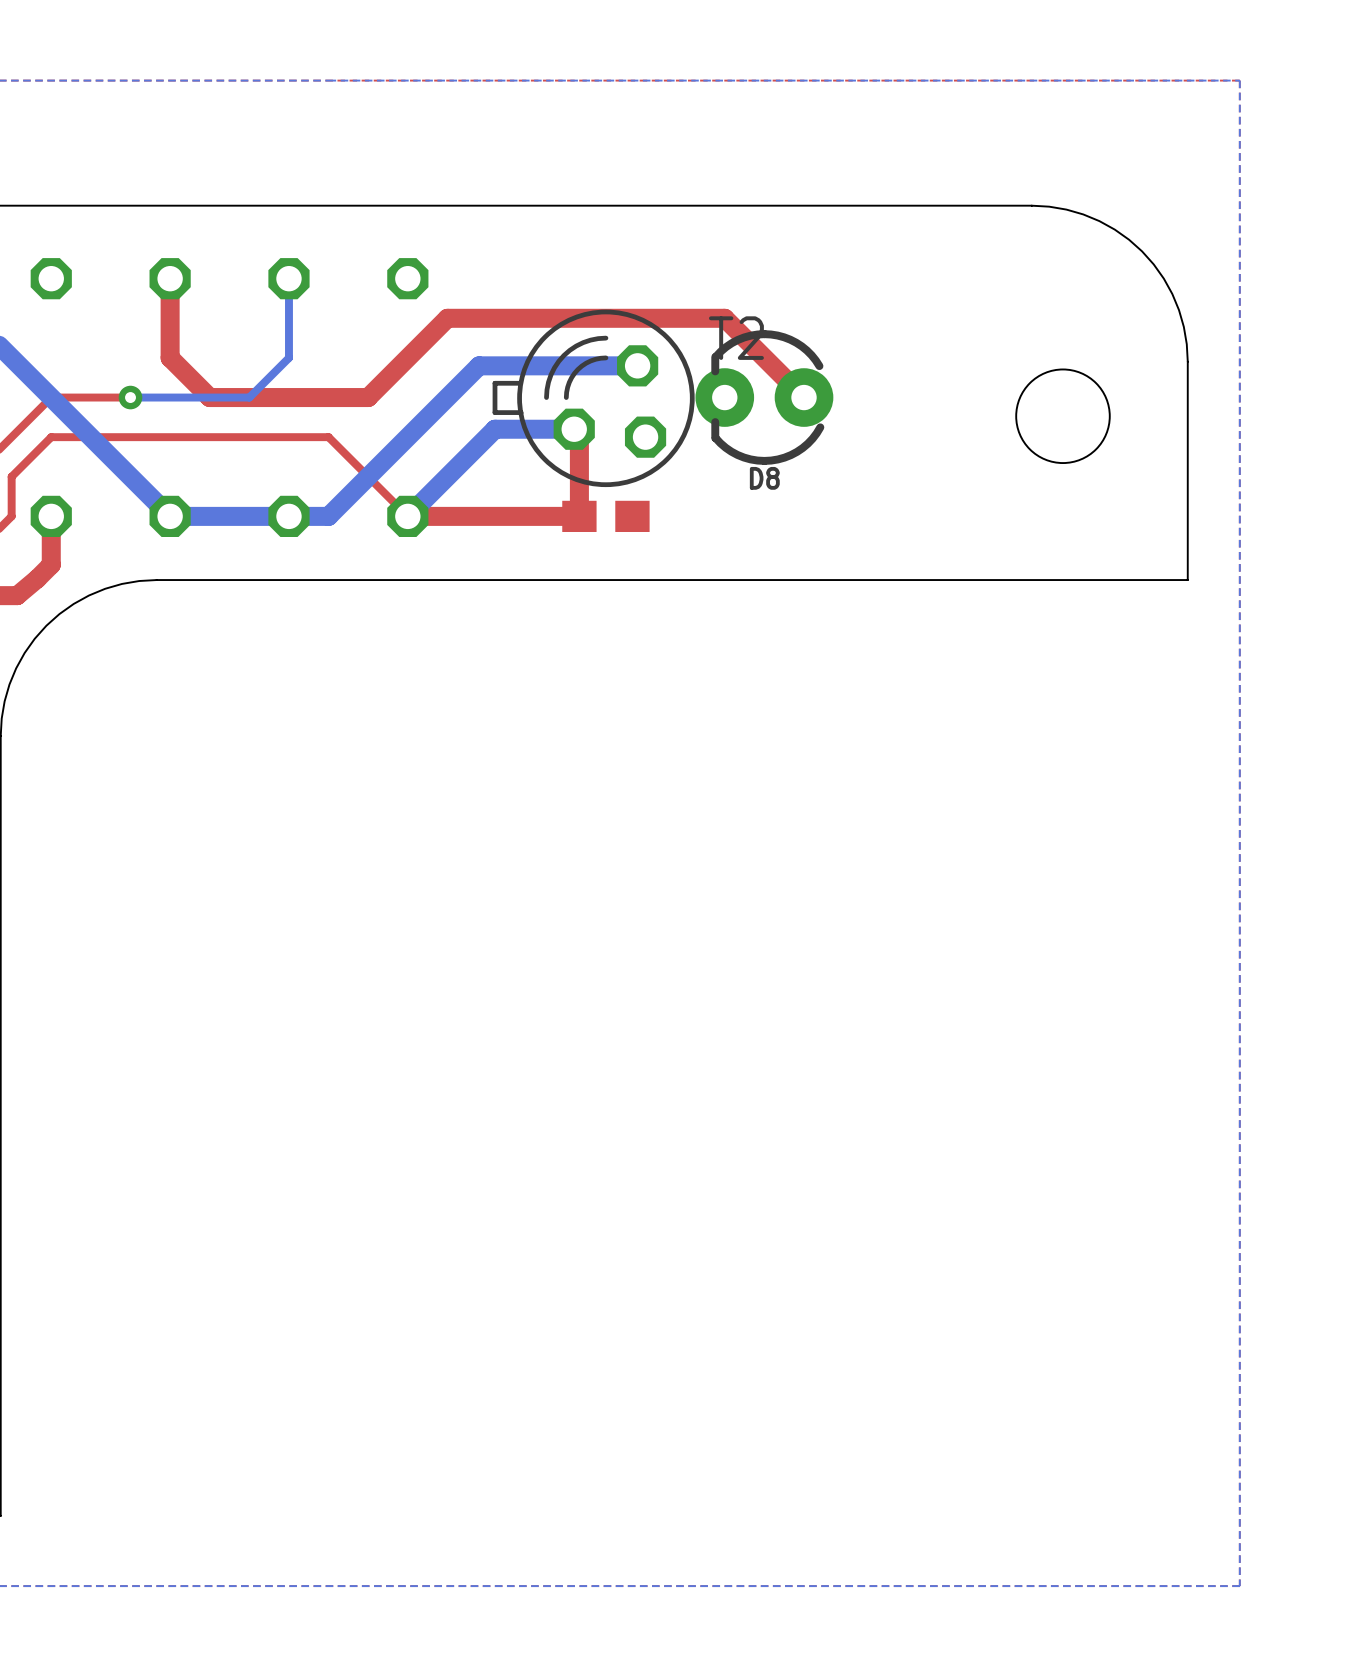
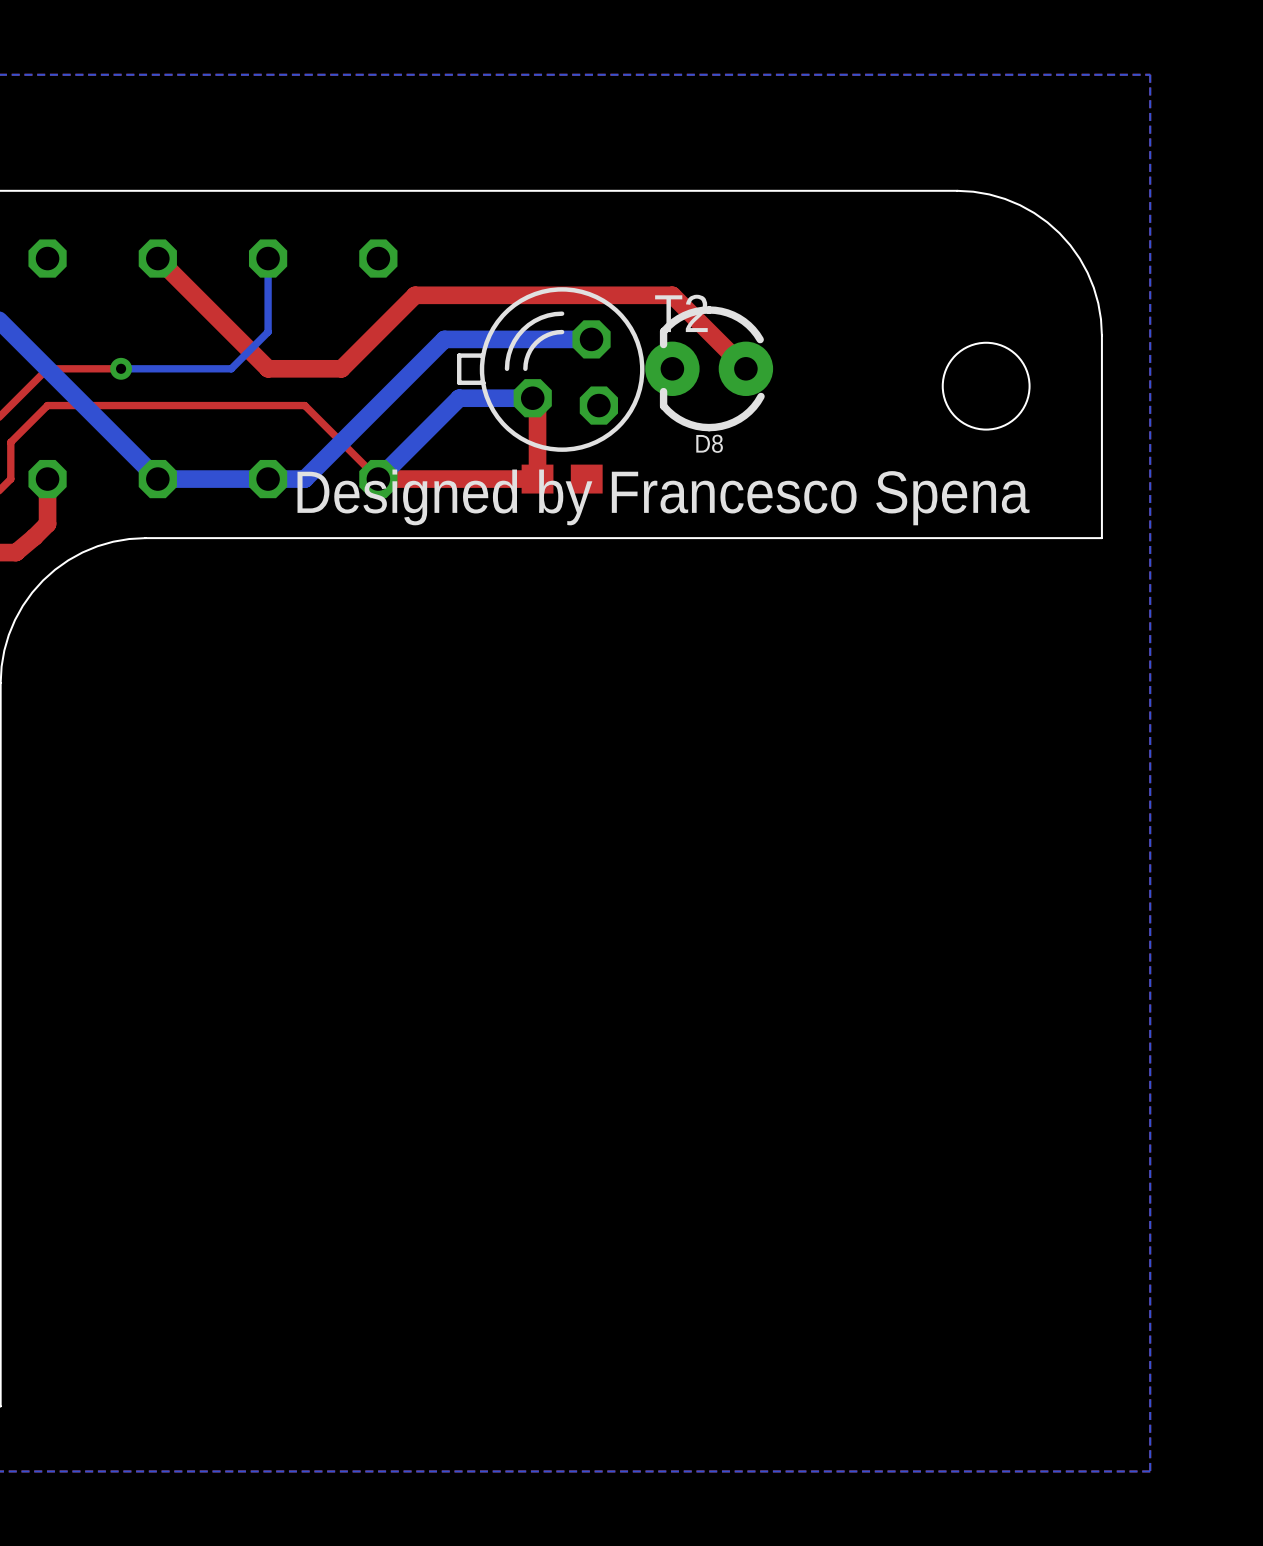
top track: (170, 278) (170, 357) (209, 397) (288, 397) -> (157, 258) (268, 368)
text: none -> Designed by Francesco Spena (663, 497)

